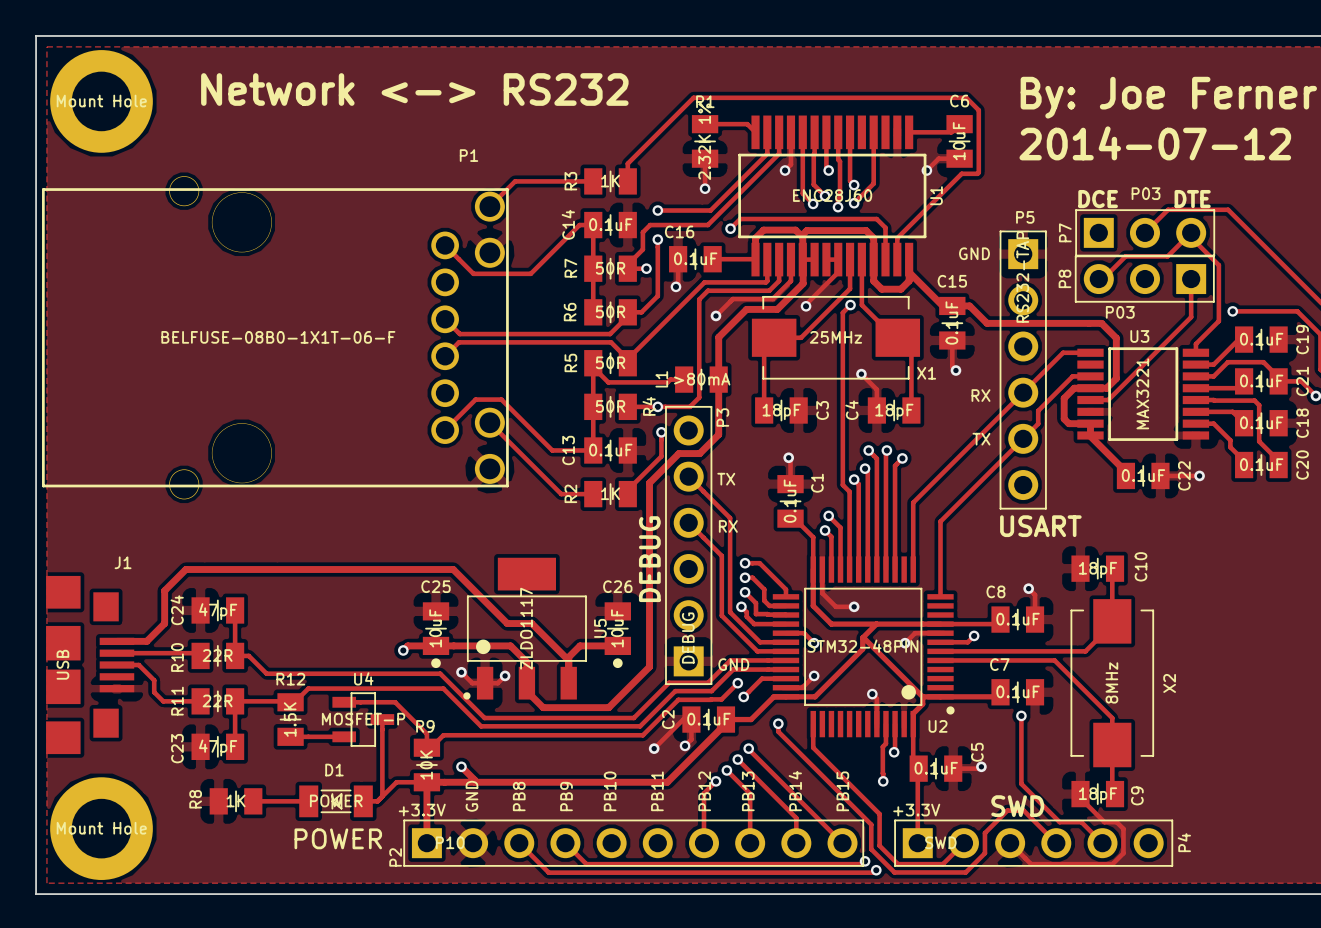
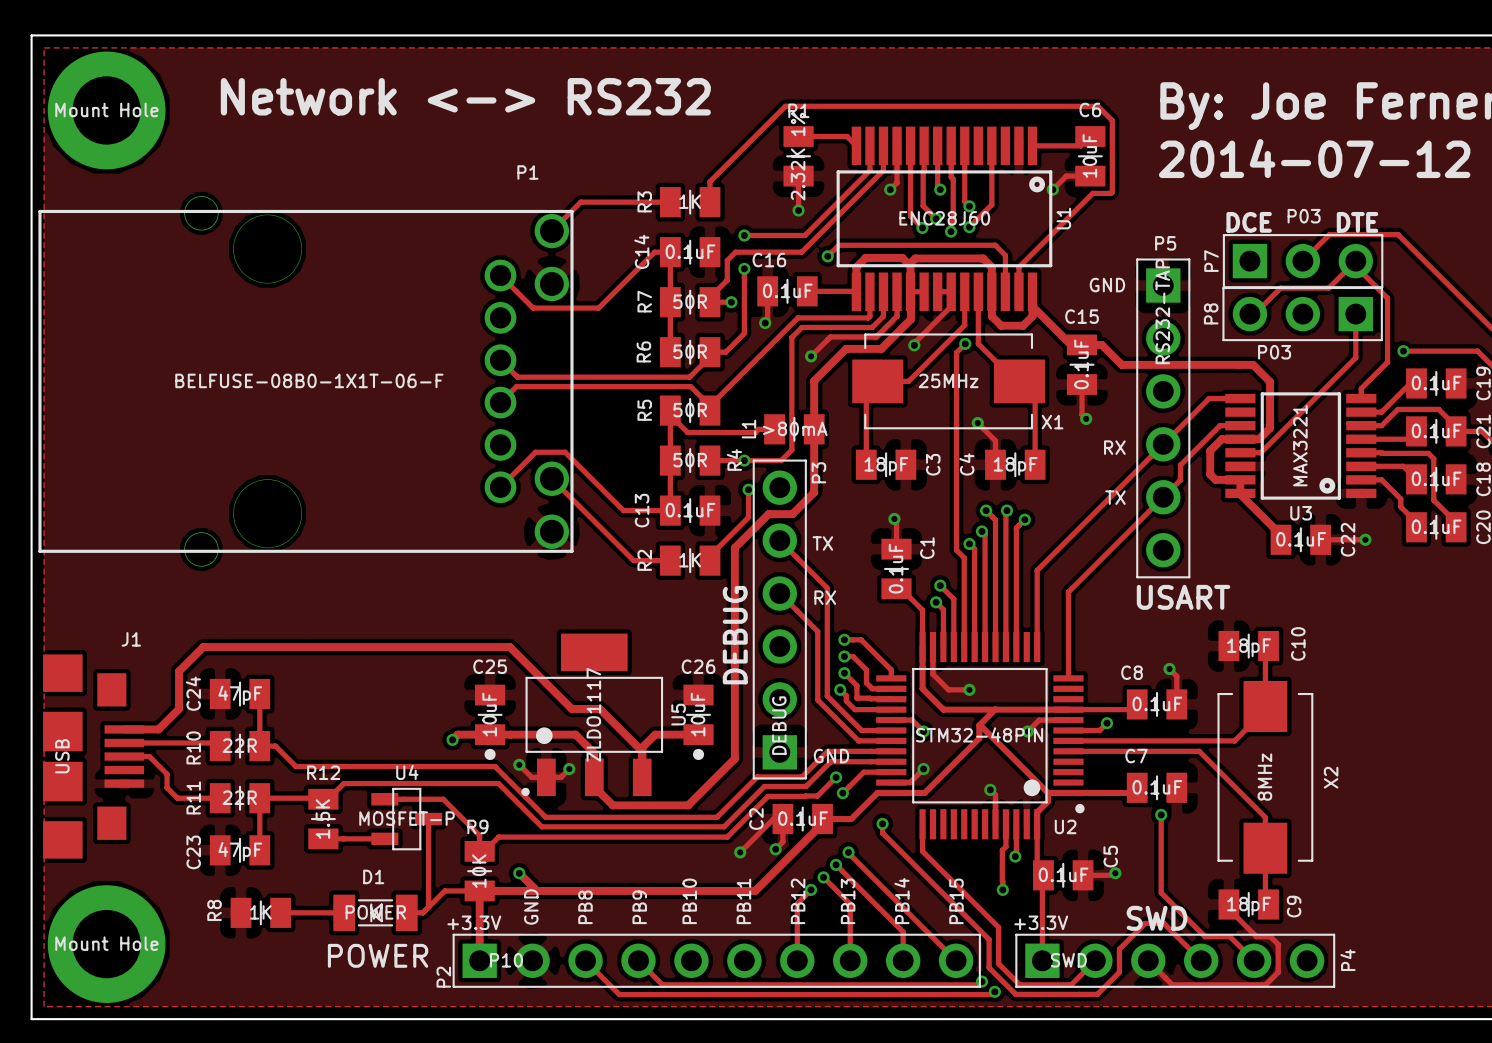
U1 footprint: [738, 115, 927, 277] -> [836, 126, 1053, 312]
U3 name position: U3 (1139, 336) -> U3 (1301, 513)
U3 footprint: [1077, 347, 1210, 441] -> [1225, 392, 1377, 500]

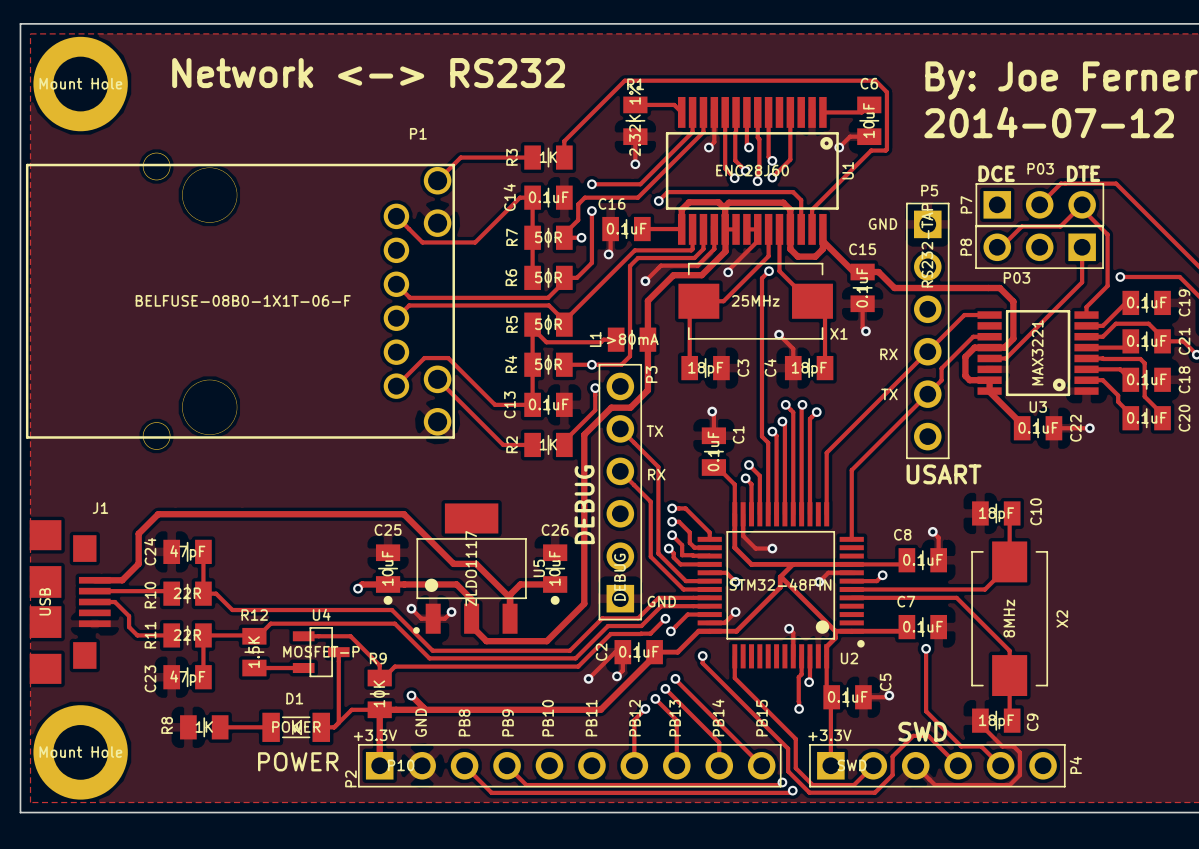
R4 name position: R4 (734, 459) -> R4 (511, 364)

